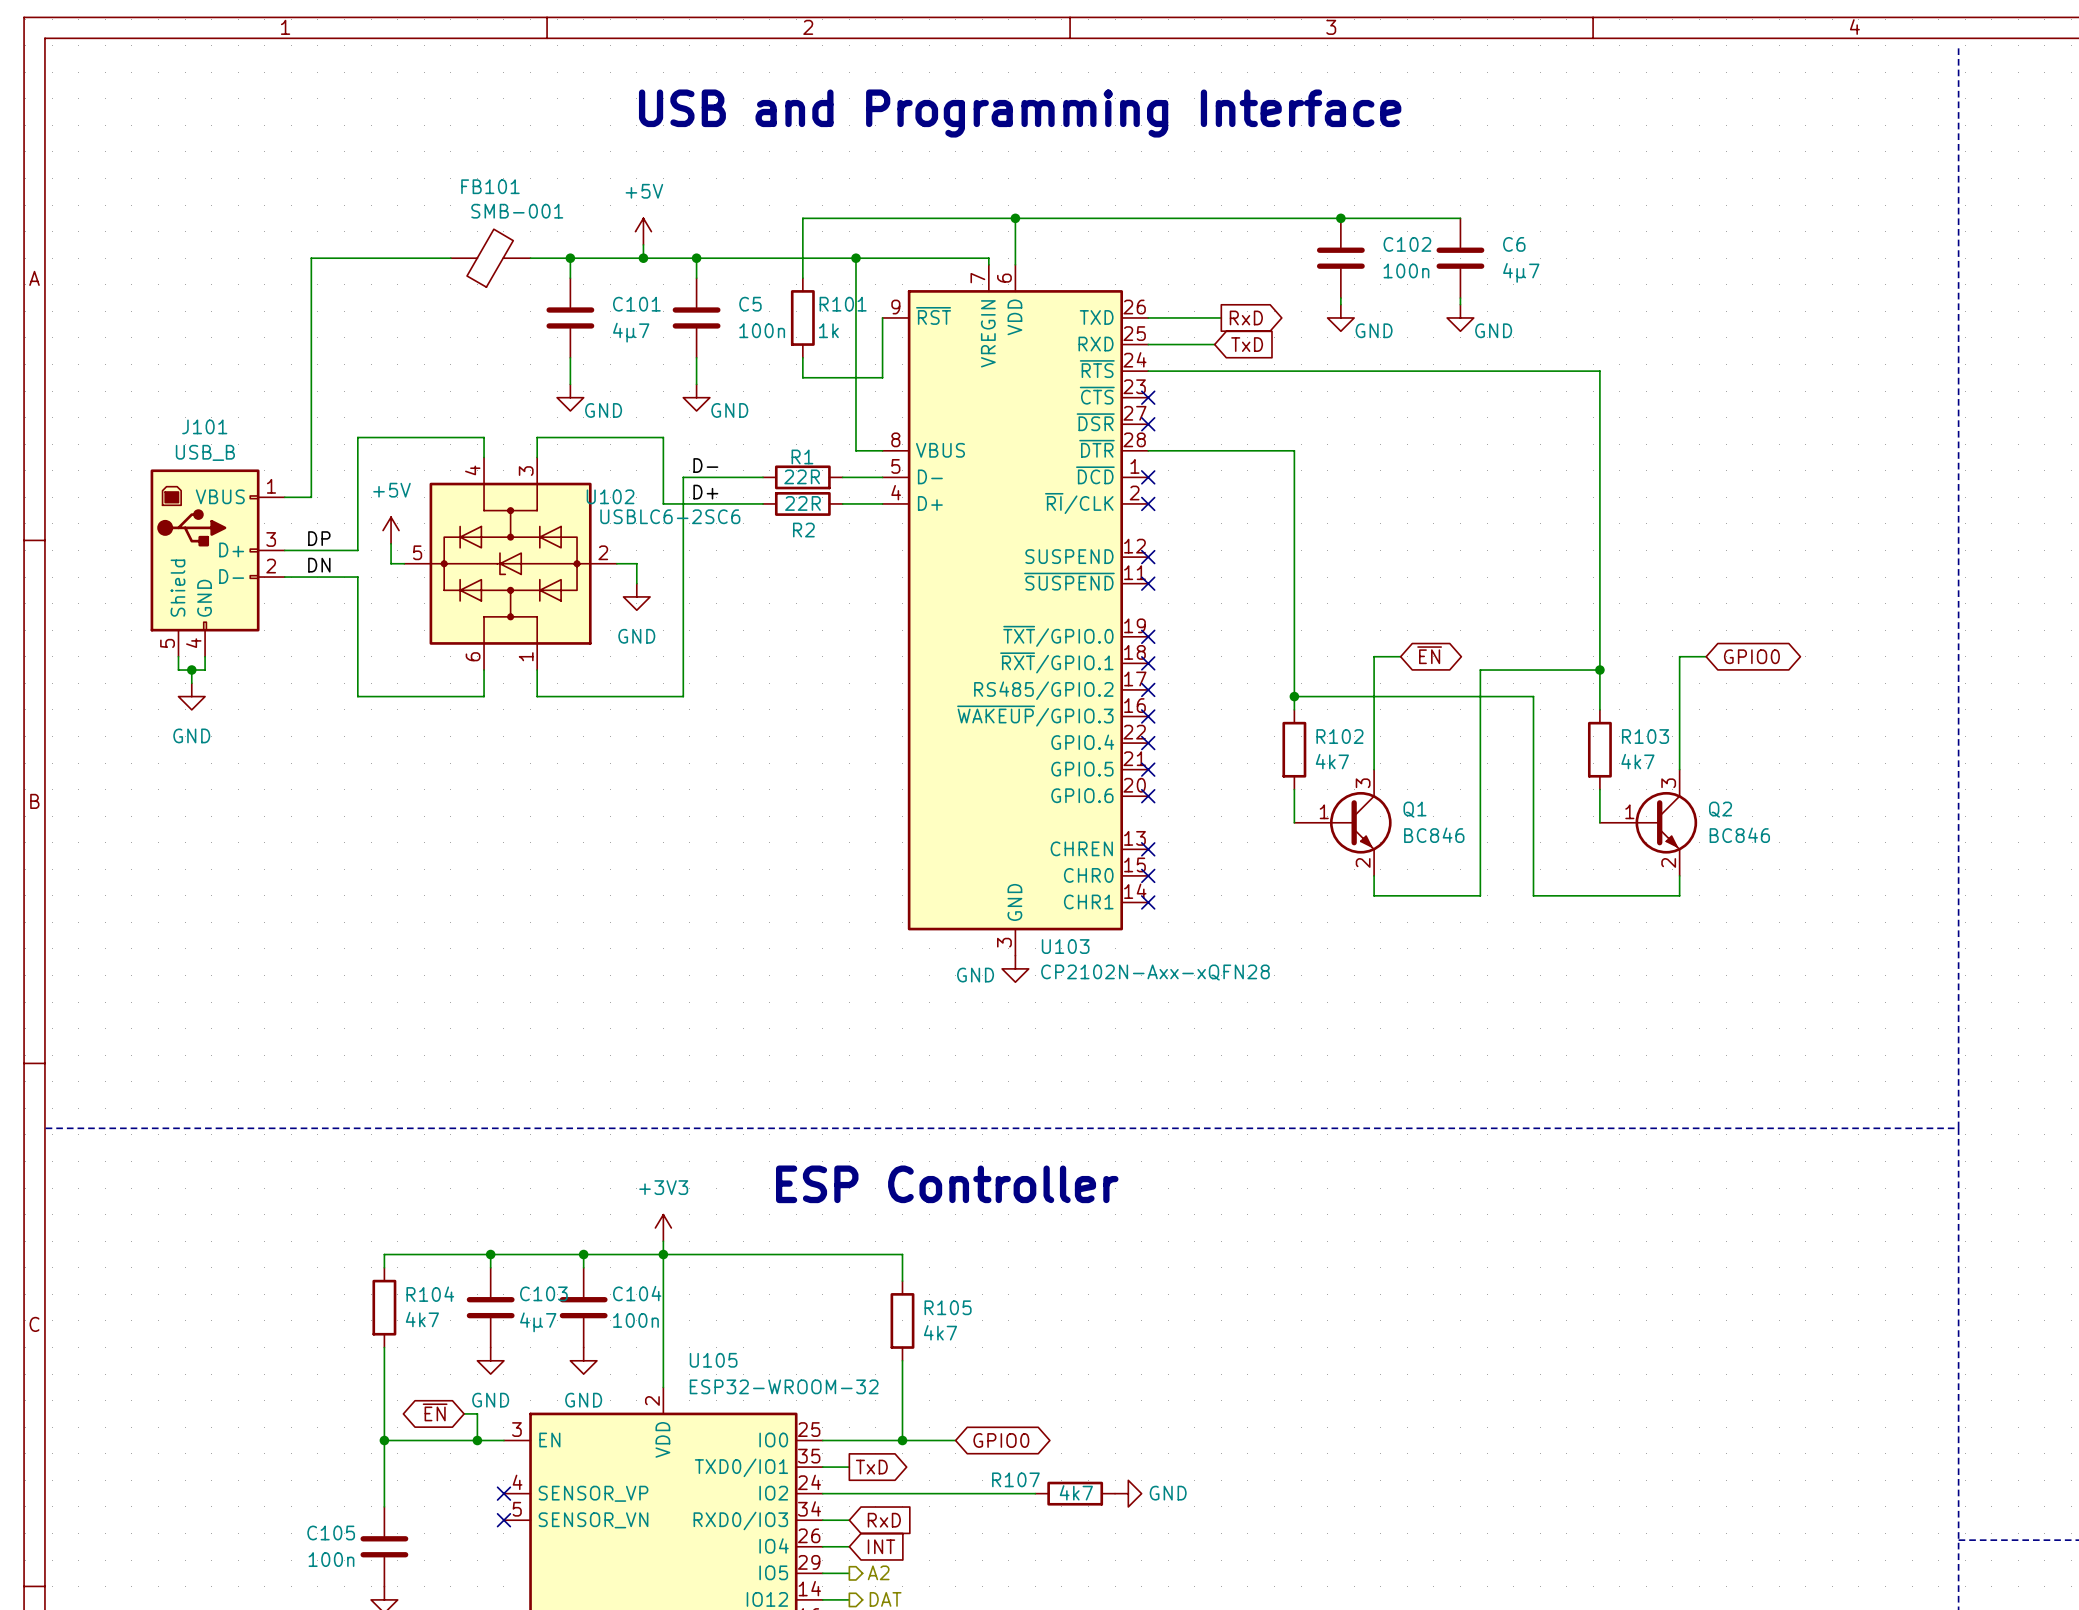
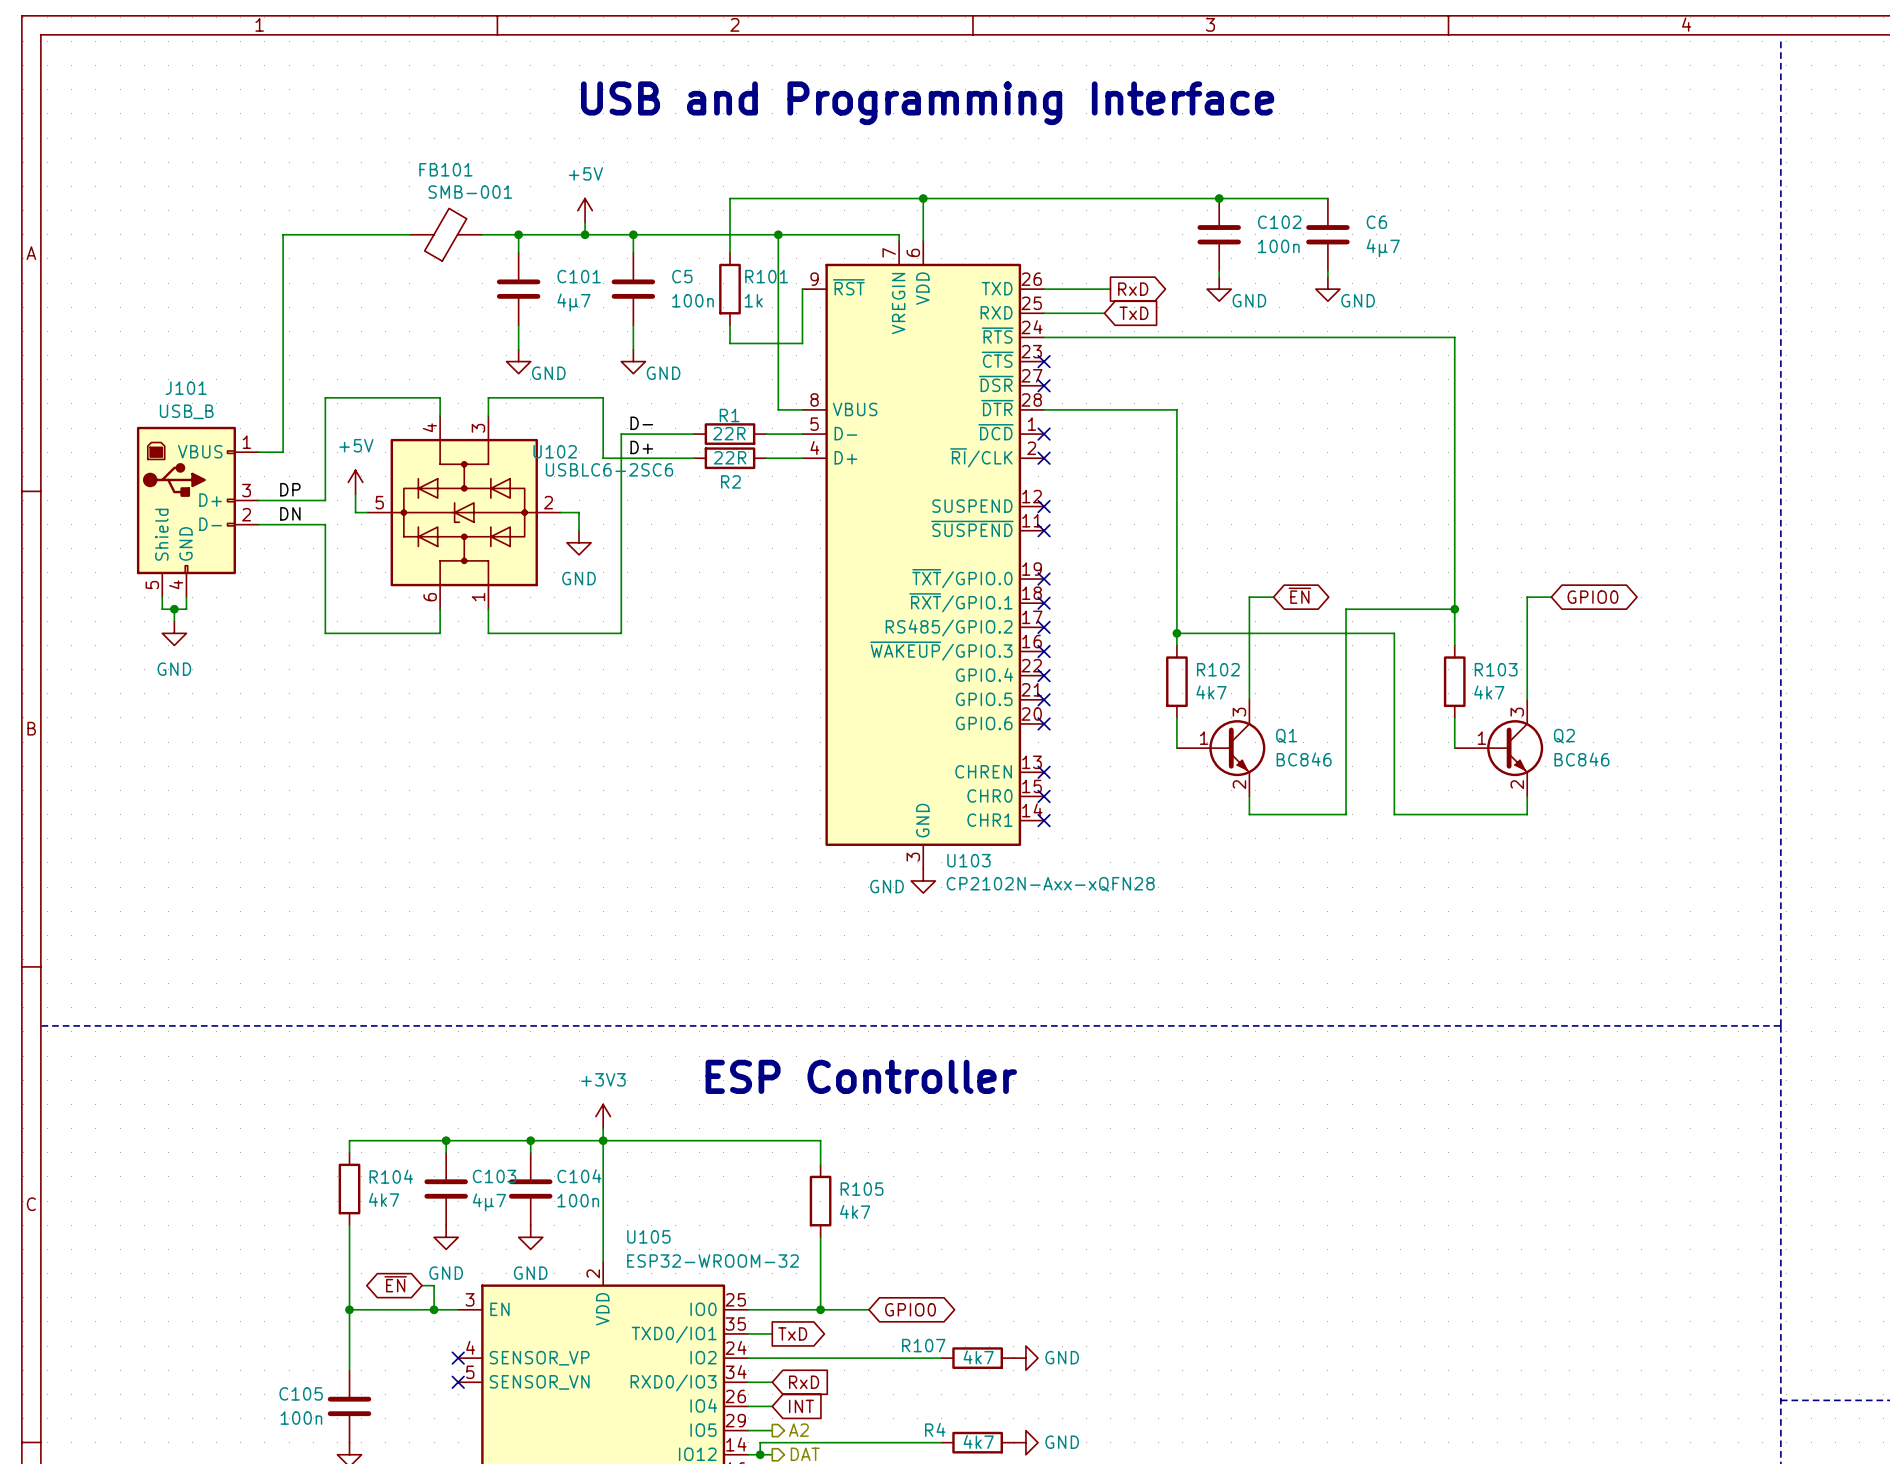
wire: none -> (941, 1442) (760, 1442) (760, 1454)
R4: none -> 4k7 (977, 1442)
power symbol: none -> GND (1025, 1442)
junction: none -> (760, 1454)

